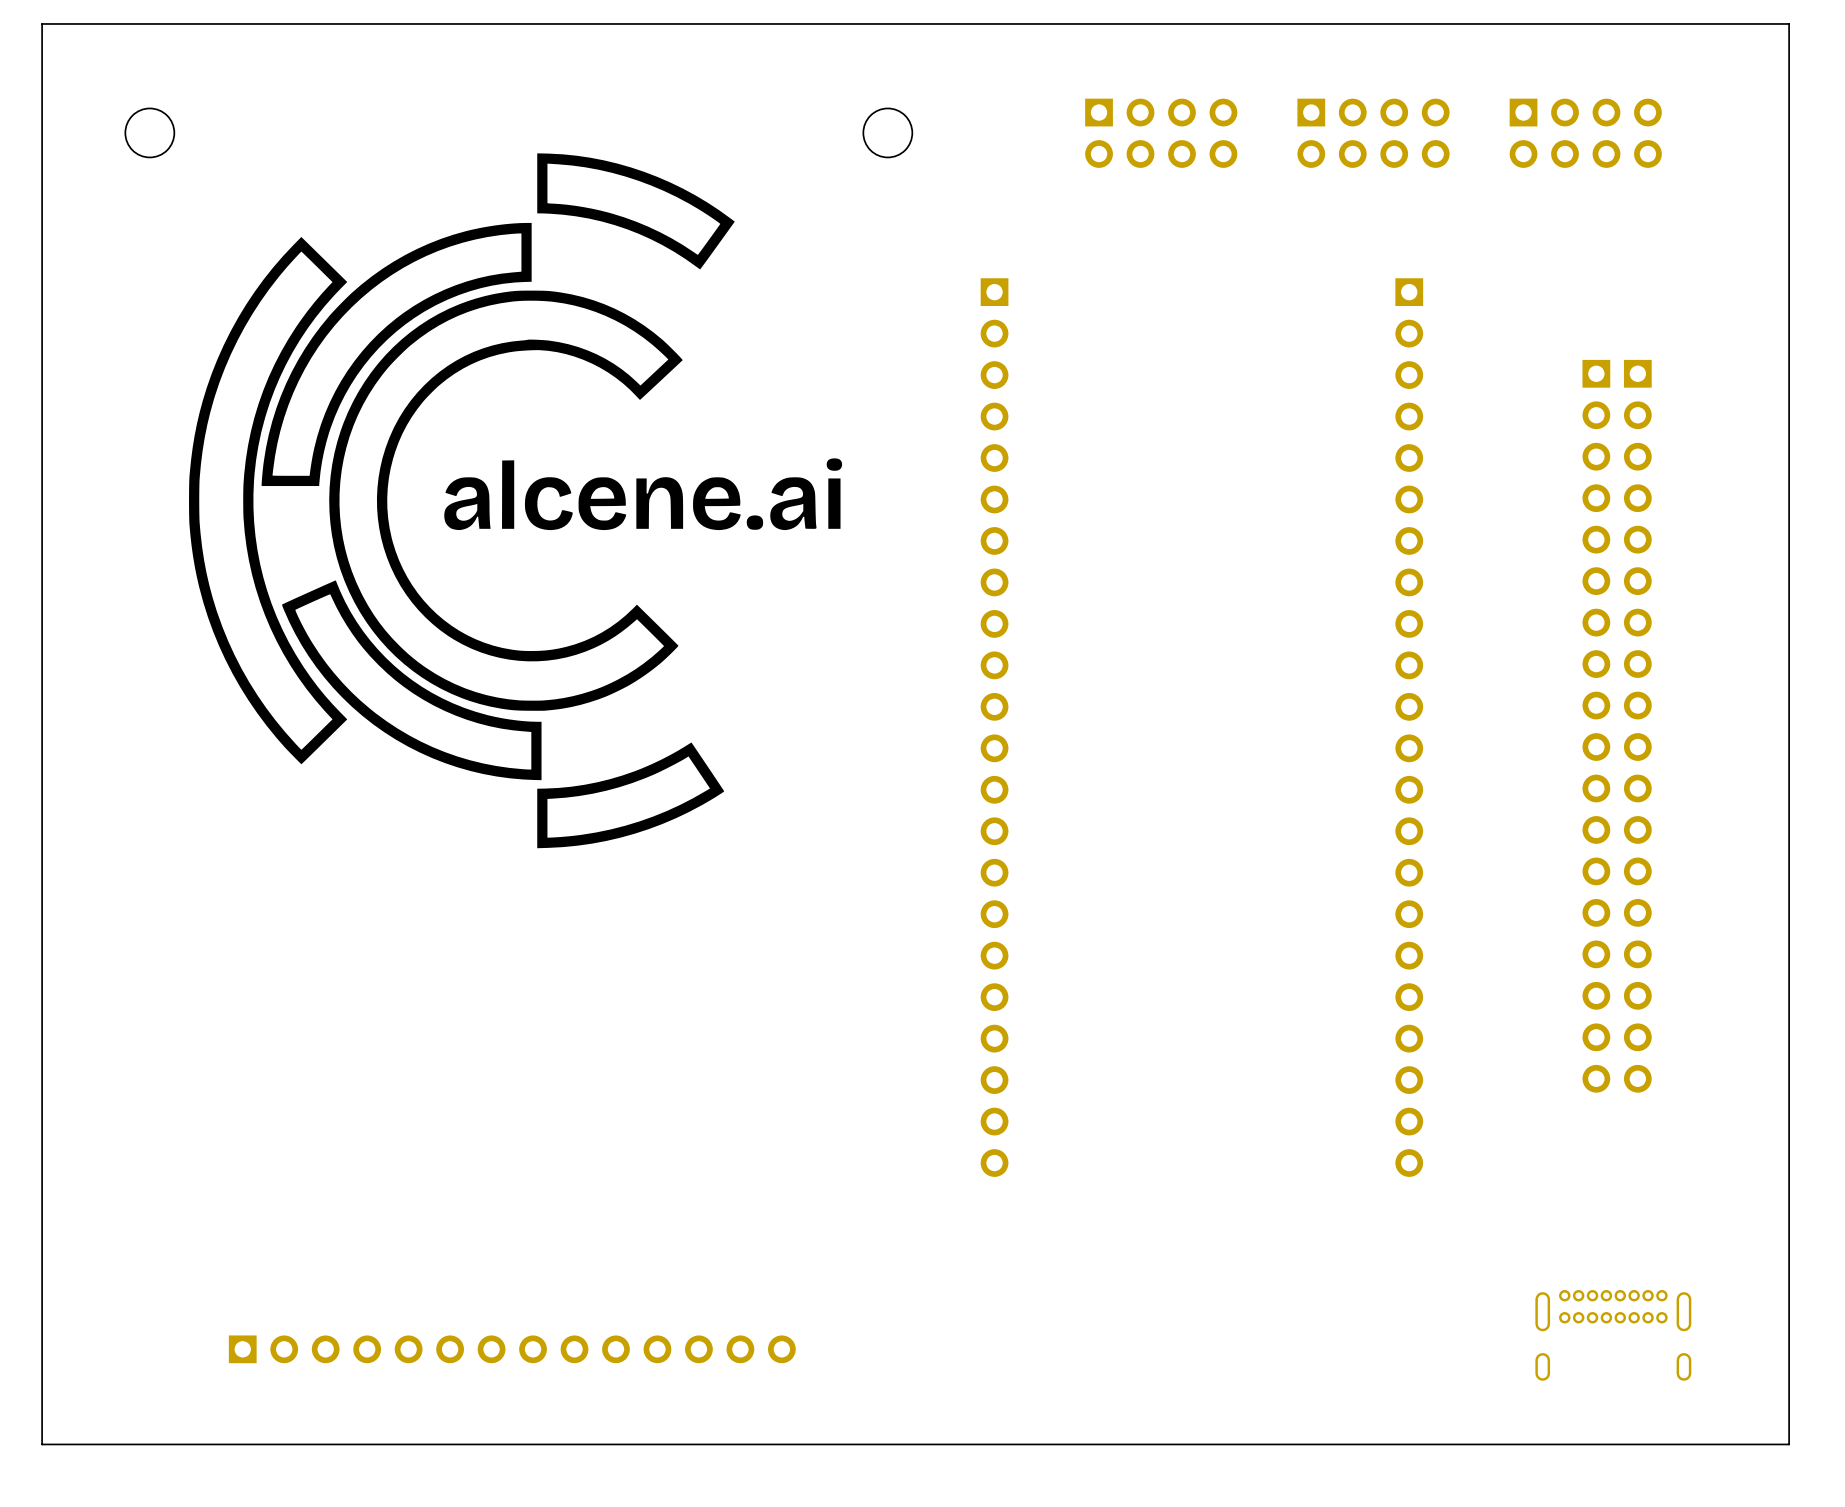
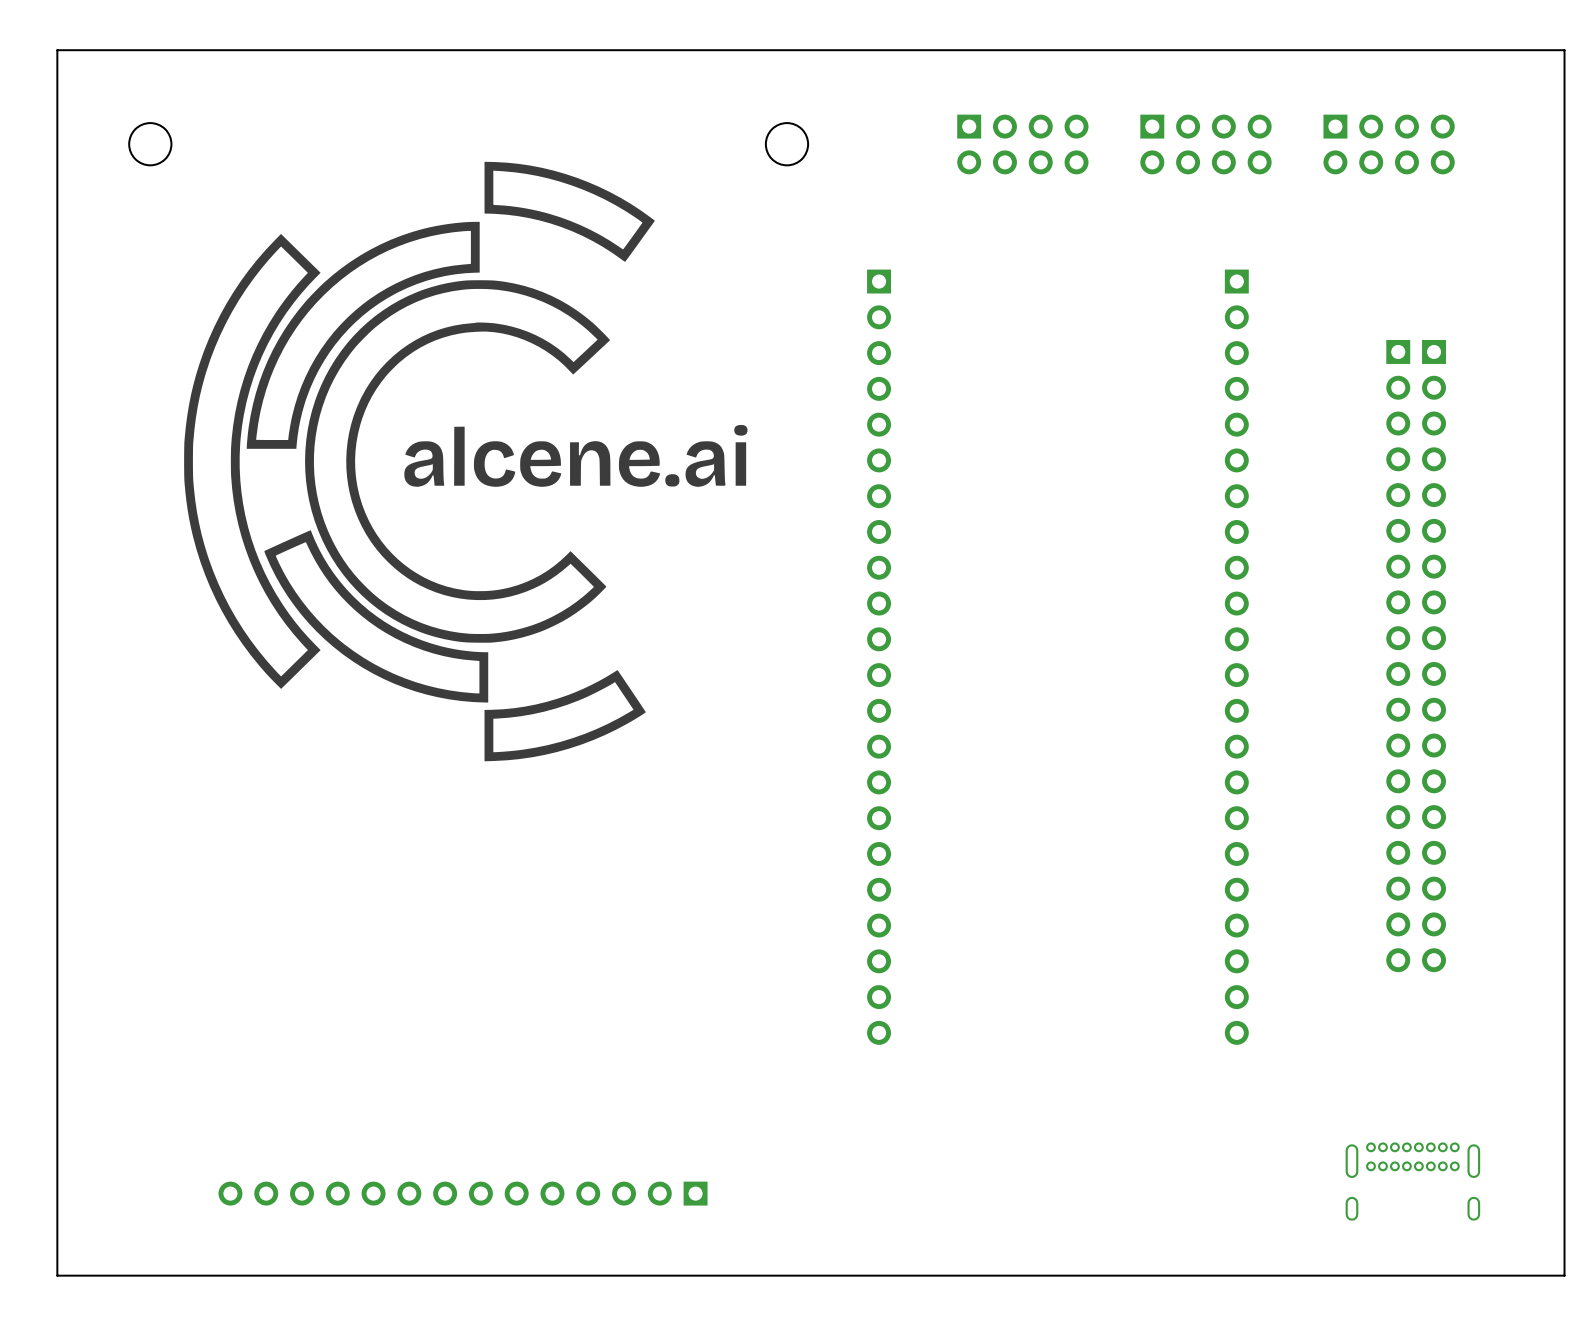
part rotation: 0° (512, 1349) -> 180° (463, 1193)

